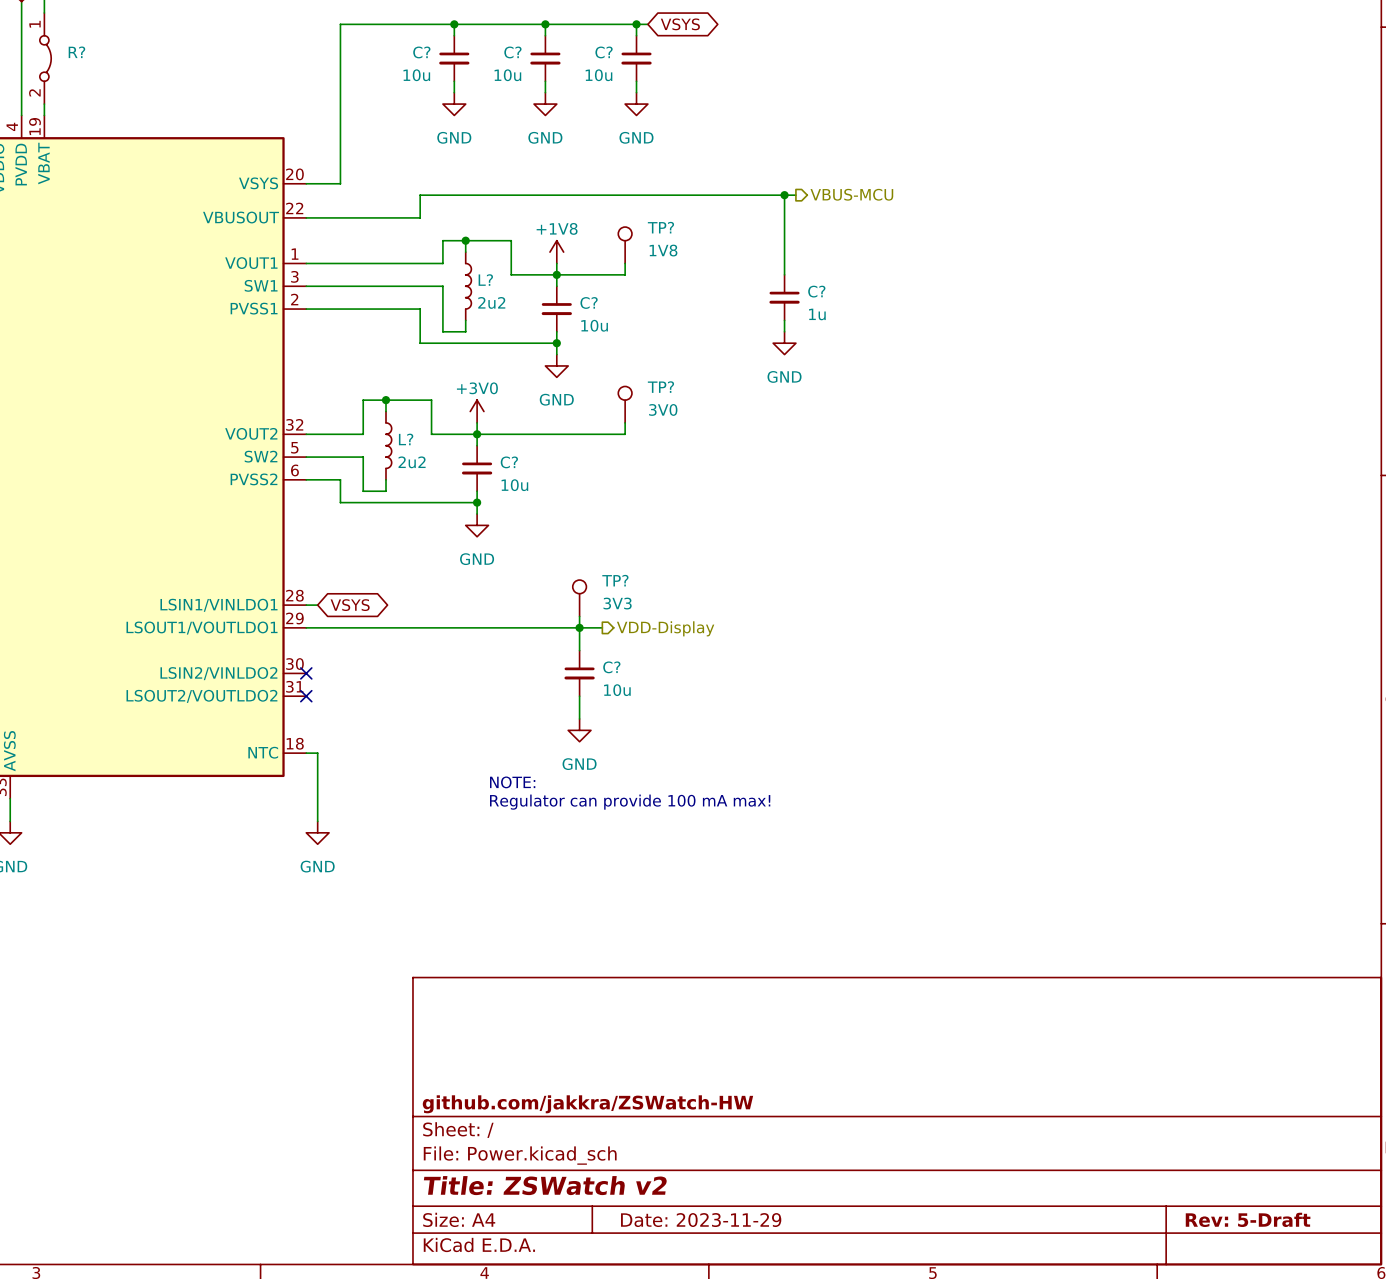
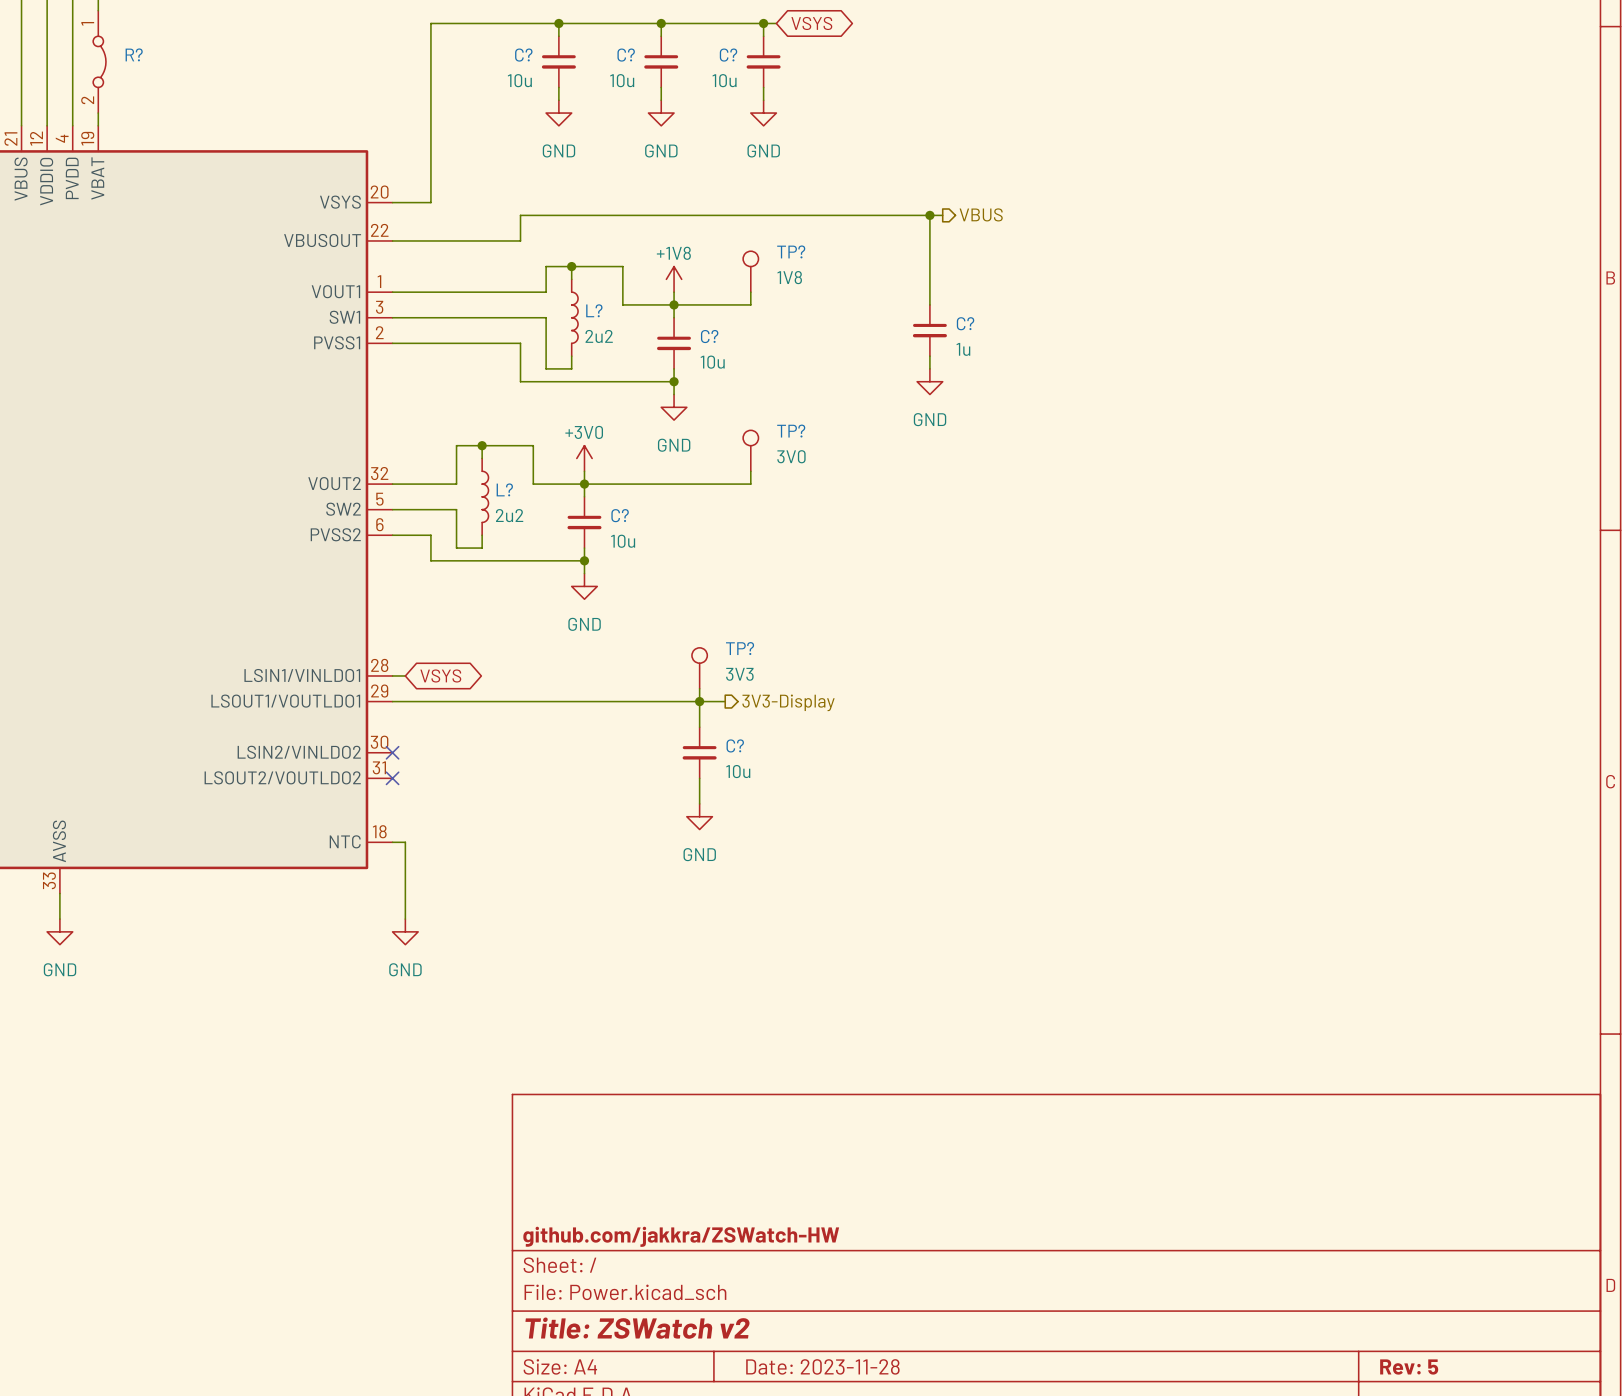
hierarchical label: VBUS-MCU (851, 194) -> VBUS (981, 214)
hierarchical label: VDD-Display (665, 628) -> 3V3-Display (788, 702)
text: NOTE: (512, 782) -> none
text: Regulator can provide 100 mA max! (630, 802) -> none
title block: Rev: 5-Draft (1248, 1219) -> Rev: 5 (1409, 1367)
title block: Date: 2023-11-29 (701, 1220) -> Date: 2023-11-28 (822, 1366)

